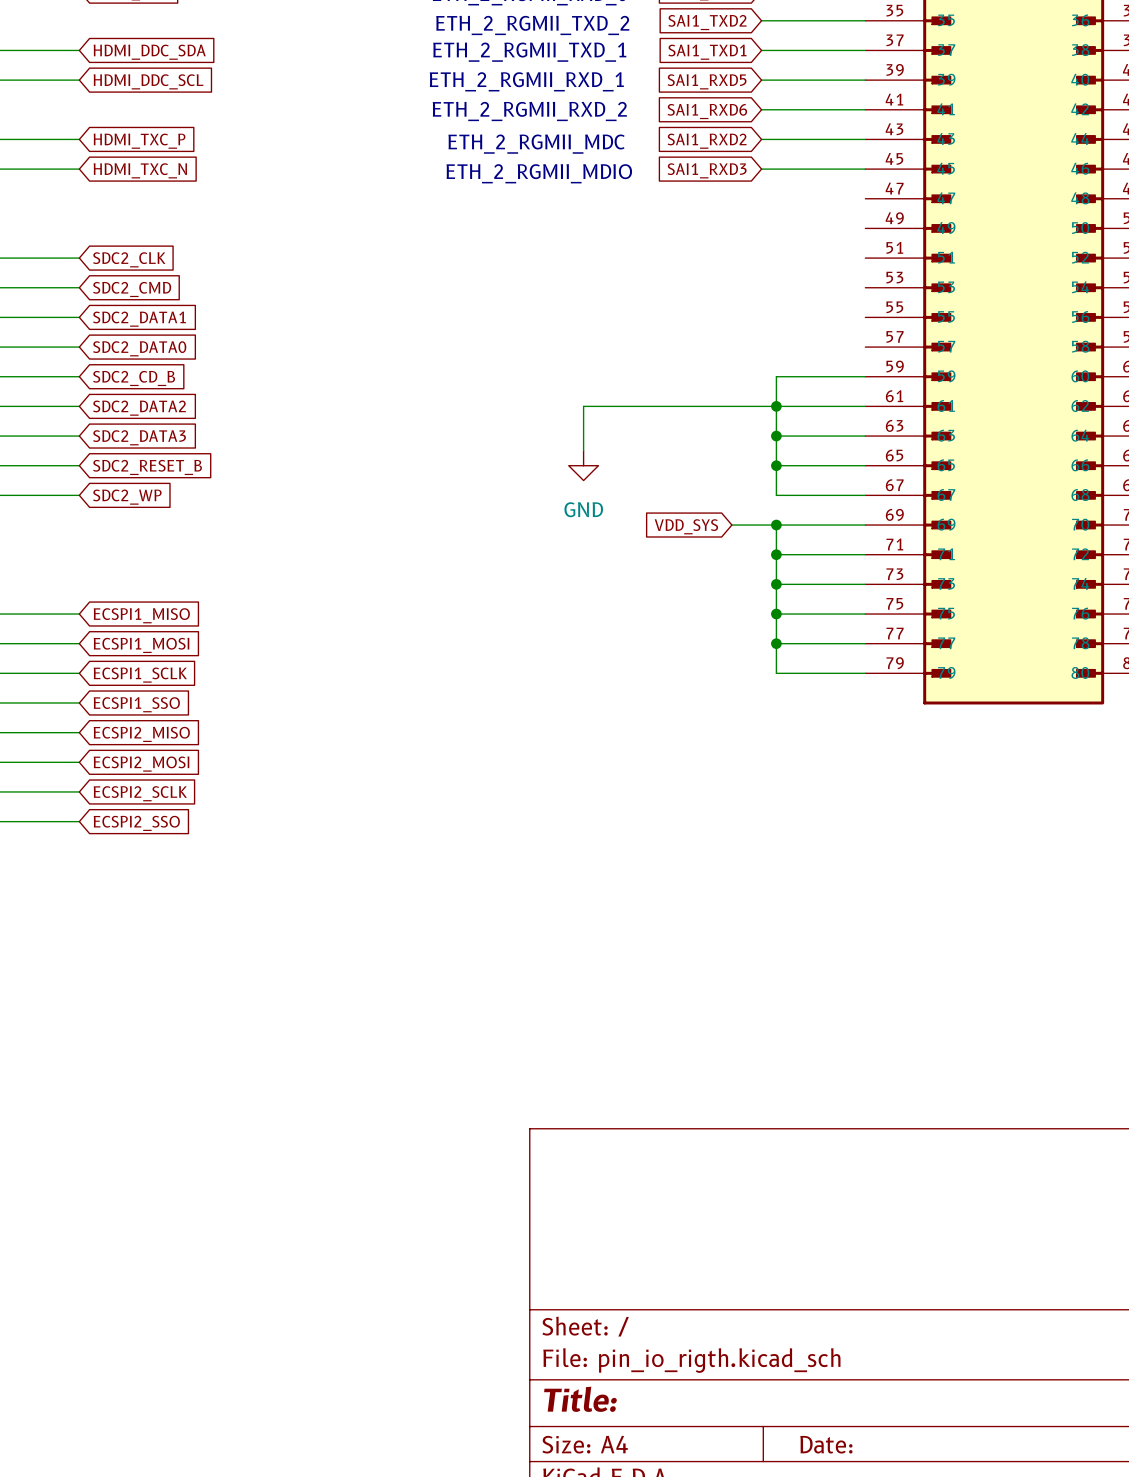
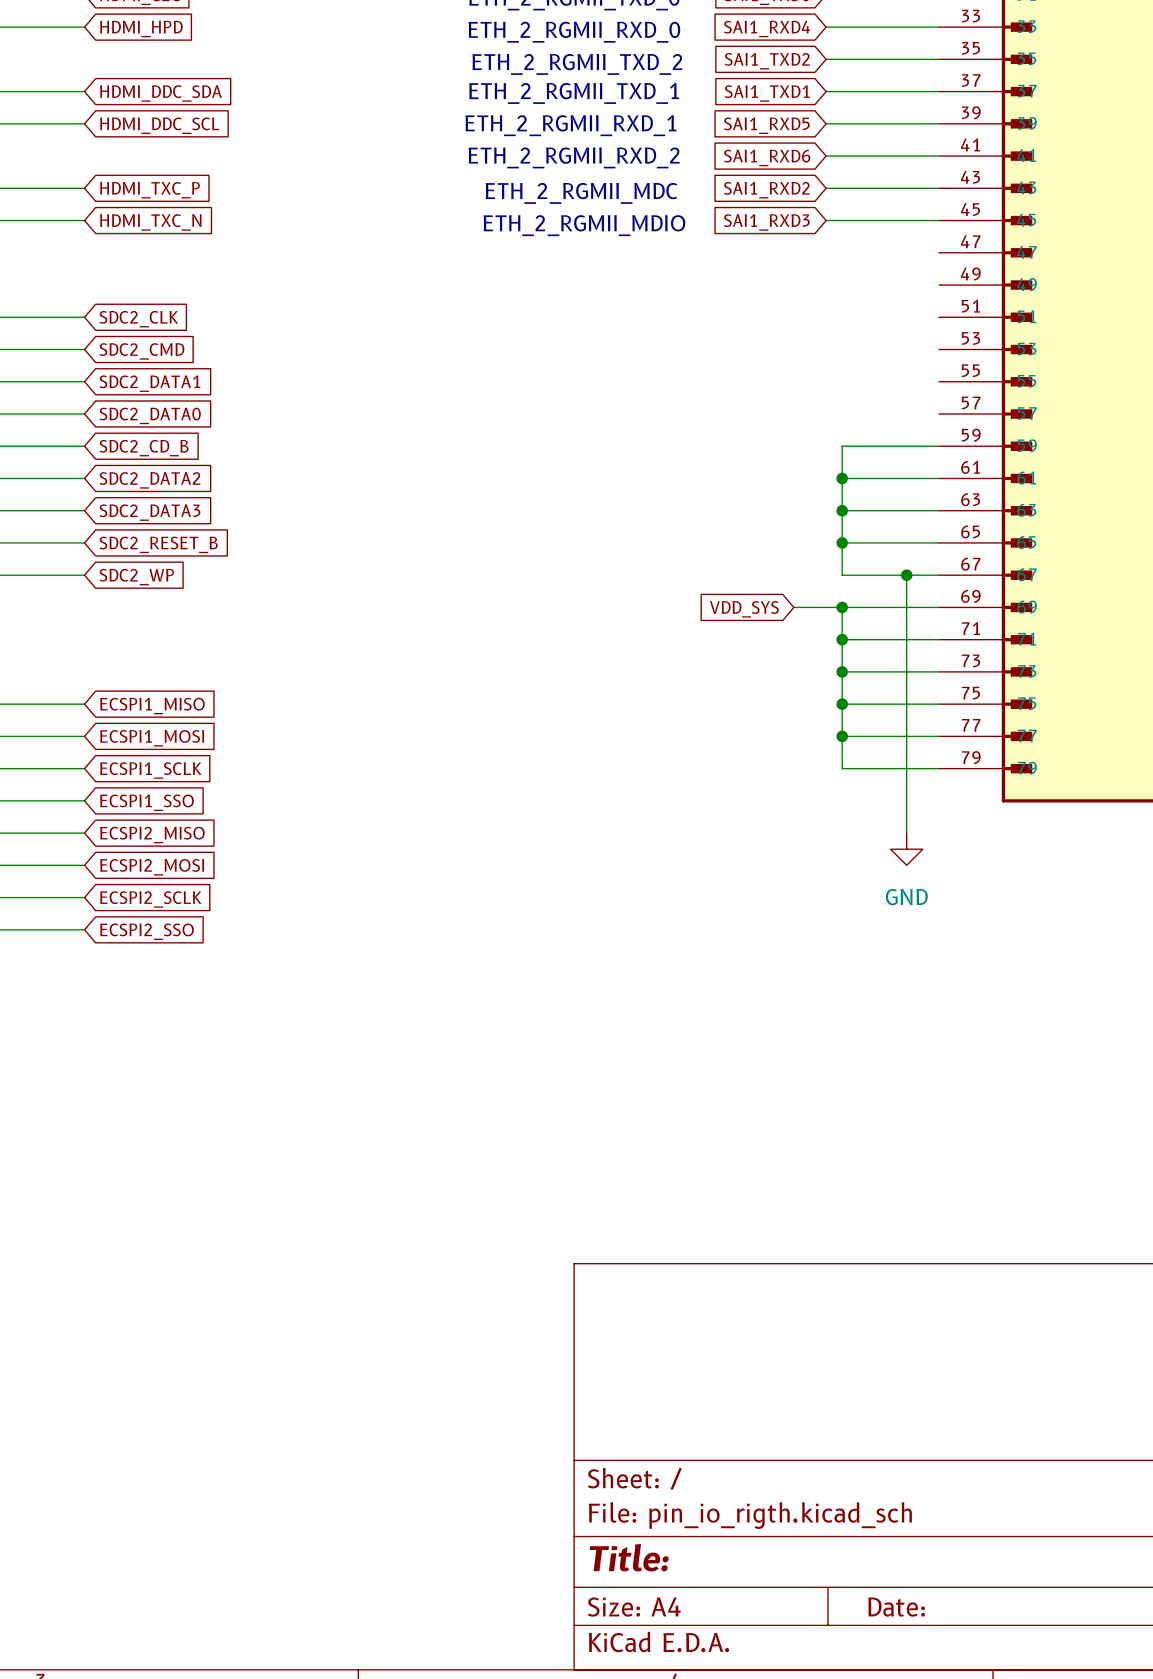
wire: (776, 406) (583, 406) (583, 450) -> none
power symbol: GND (583, 465) -> none
wire: none -> (906, 575) (906, 833)
junction: none -> (906, 575)
power symbol: none -> GND (906, 849)

